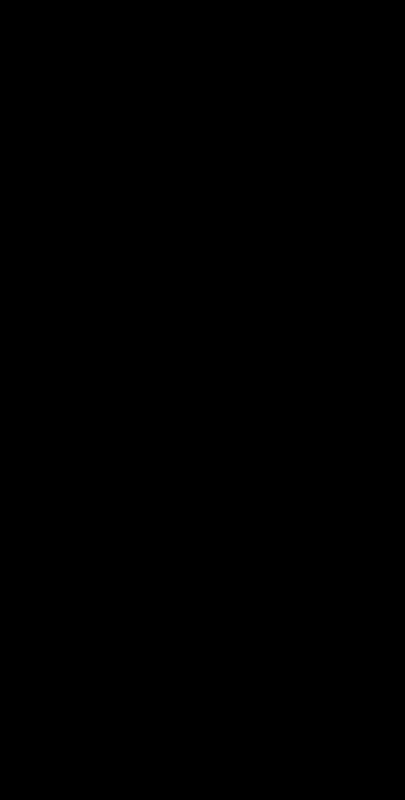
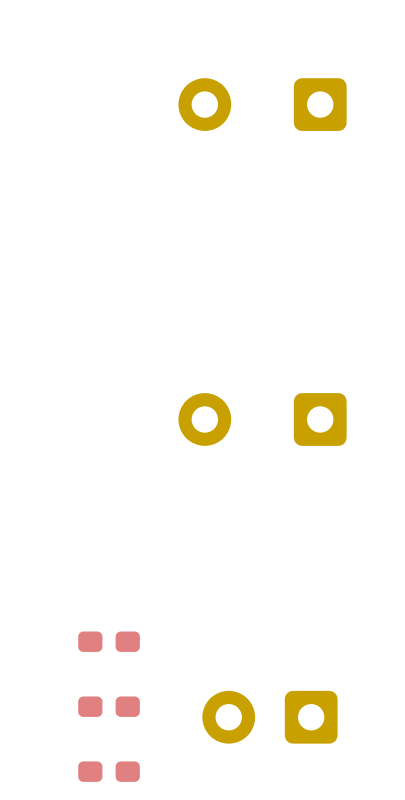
part: none -> (262, 104)
part: none -> (262, 419)
part: none -> (109, 641)
part: none -> (109, 706)
part: none -> (269, 717)
part: none -> (109, 771)

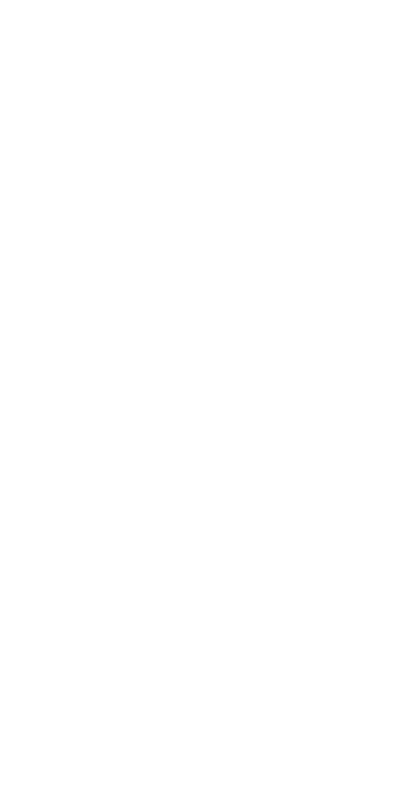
part: (262, 104) -> none
part: (262, 419) -> none
part: (109, 641) -> none
part: (109, 706) -> none
part: (269, 717) -> none
part: (109, 771) -> none

